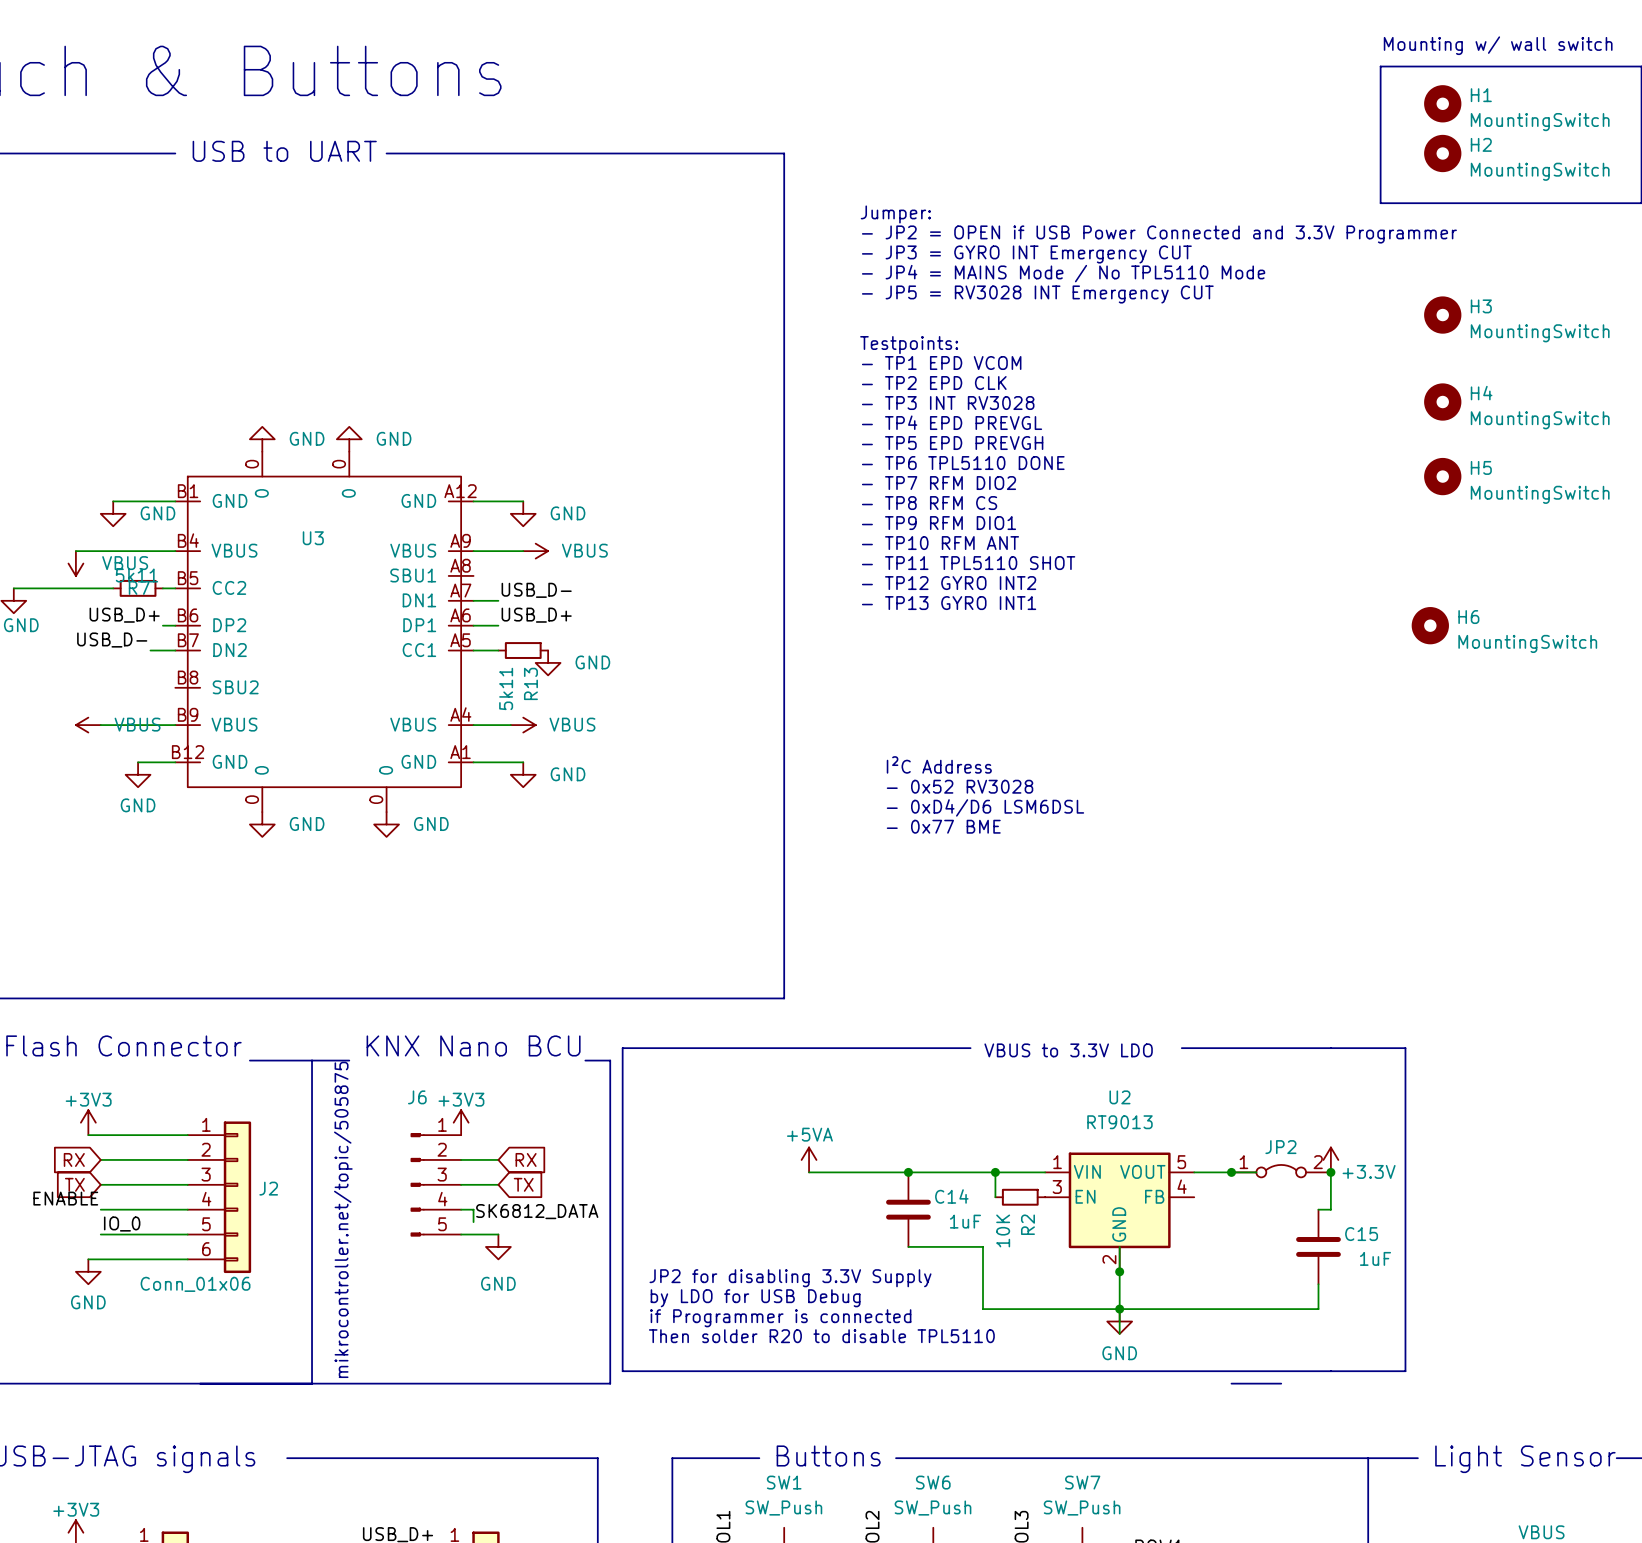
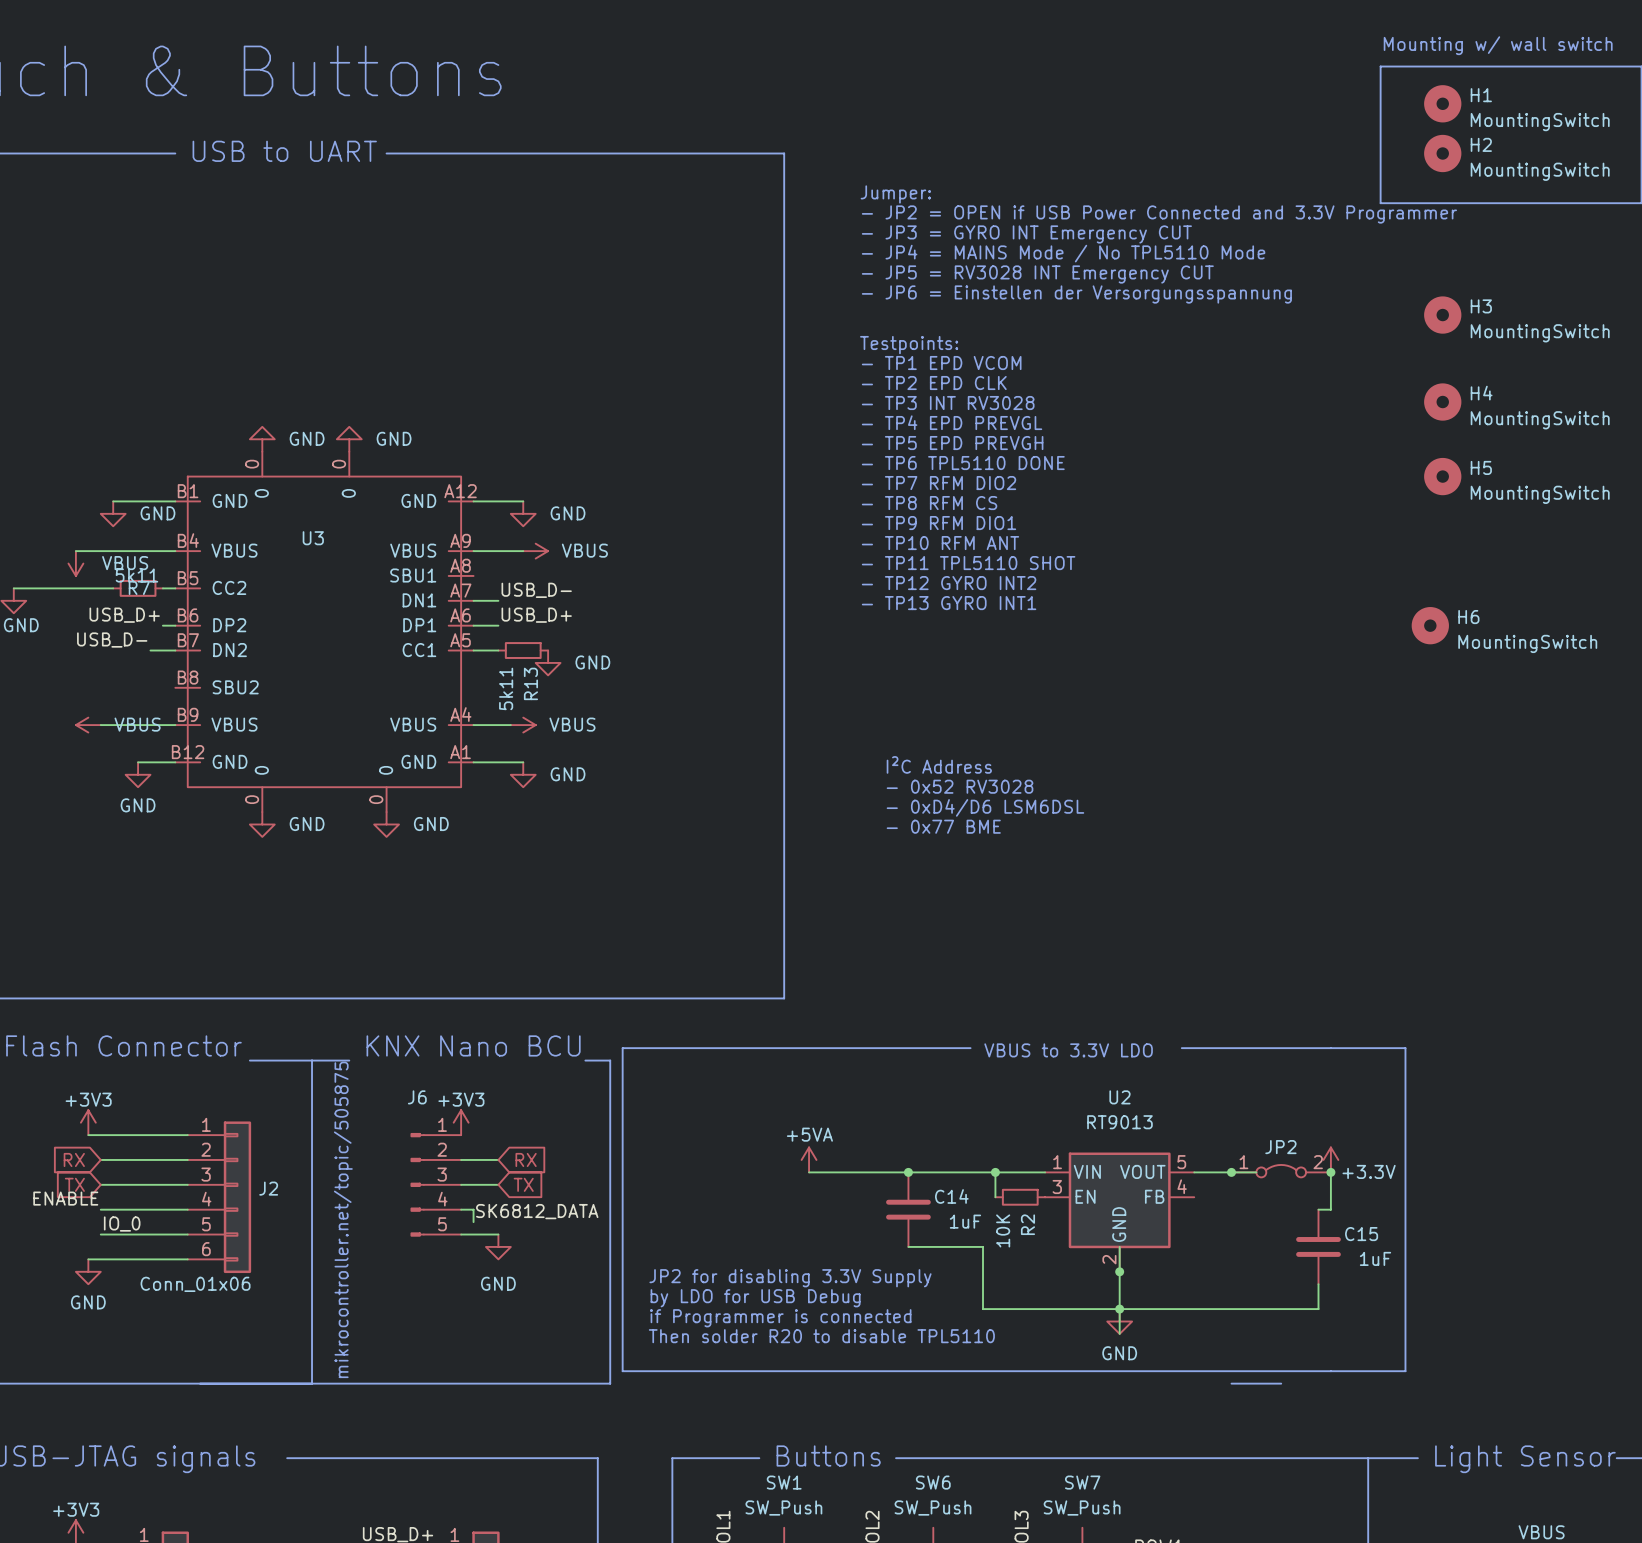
text: none -> Jumper: (895, 194)
text: Jumper: (895, 214) -> - JP2 = OPEN if USB Power Connected and 3.3V Programmer (1159, 214)
text: - JP2 = OPEN if USB Power Connected and 3.3V Programmer (1159, 234) -> - JP3 = GYRO INT Emergency CUT (1026, 234)
text: - JP3 = GYRO INT Emergency CUT (1026, 254) -> - JP4 = MAINS Mode / No TPL5110 Mode (1063, 253)
text: - JP4 = MAINS Mode / No TPL5110 Mode (1063, 273) -> - JP5 = RV3028 INT Emergency CUT (1037, 274)
text: - JP5 = RV3028 INT Emergency CUT (1037, 294) -> - JP6 = Einstellen der Versorgungsspannung (1076, 294)

